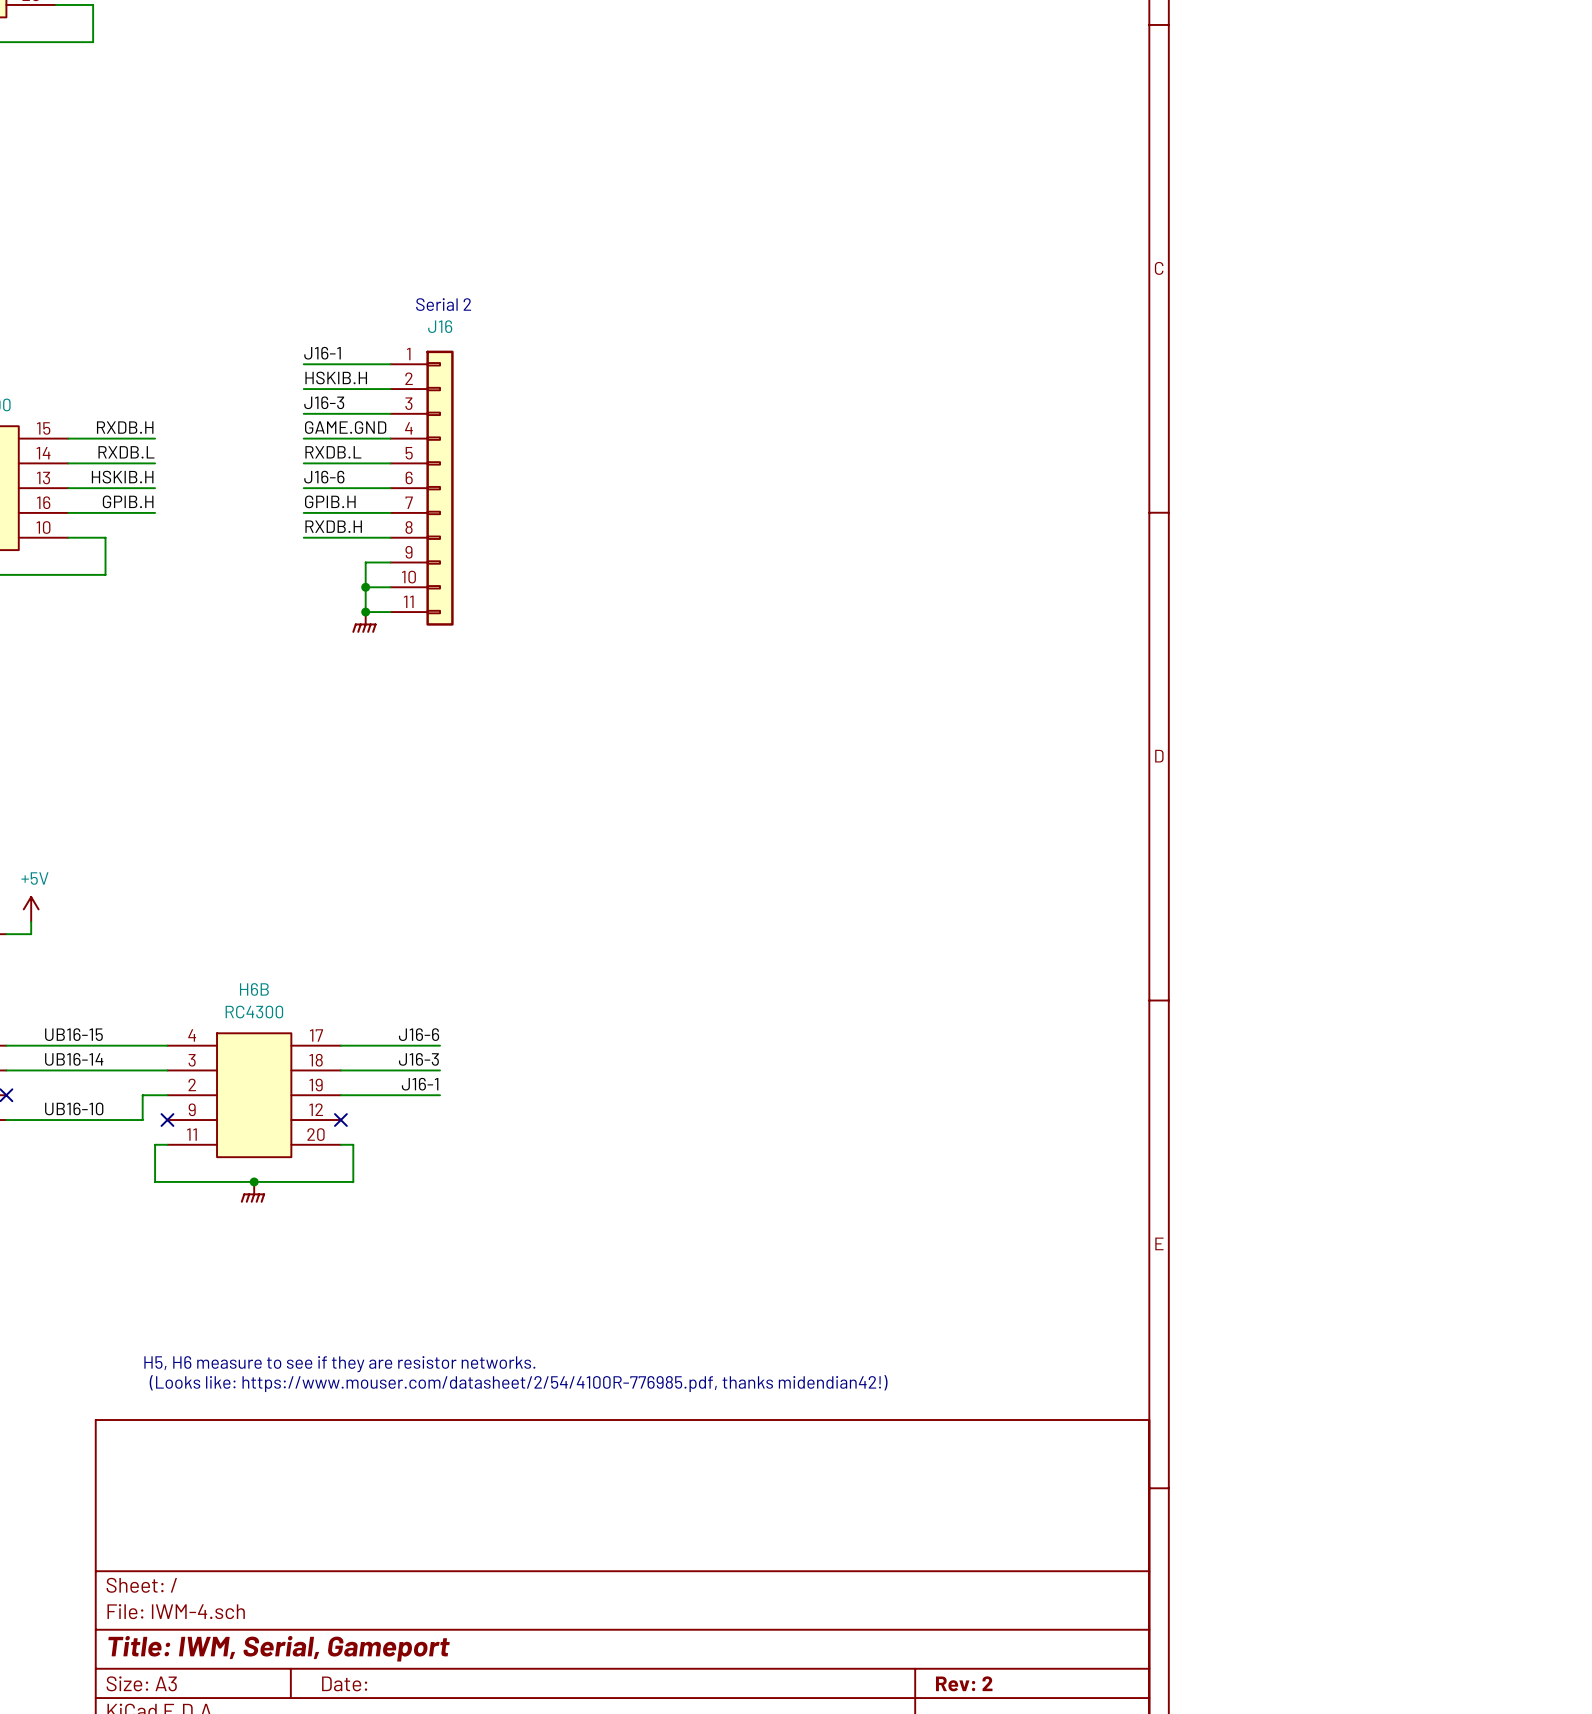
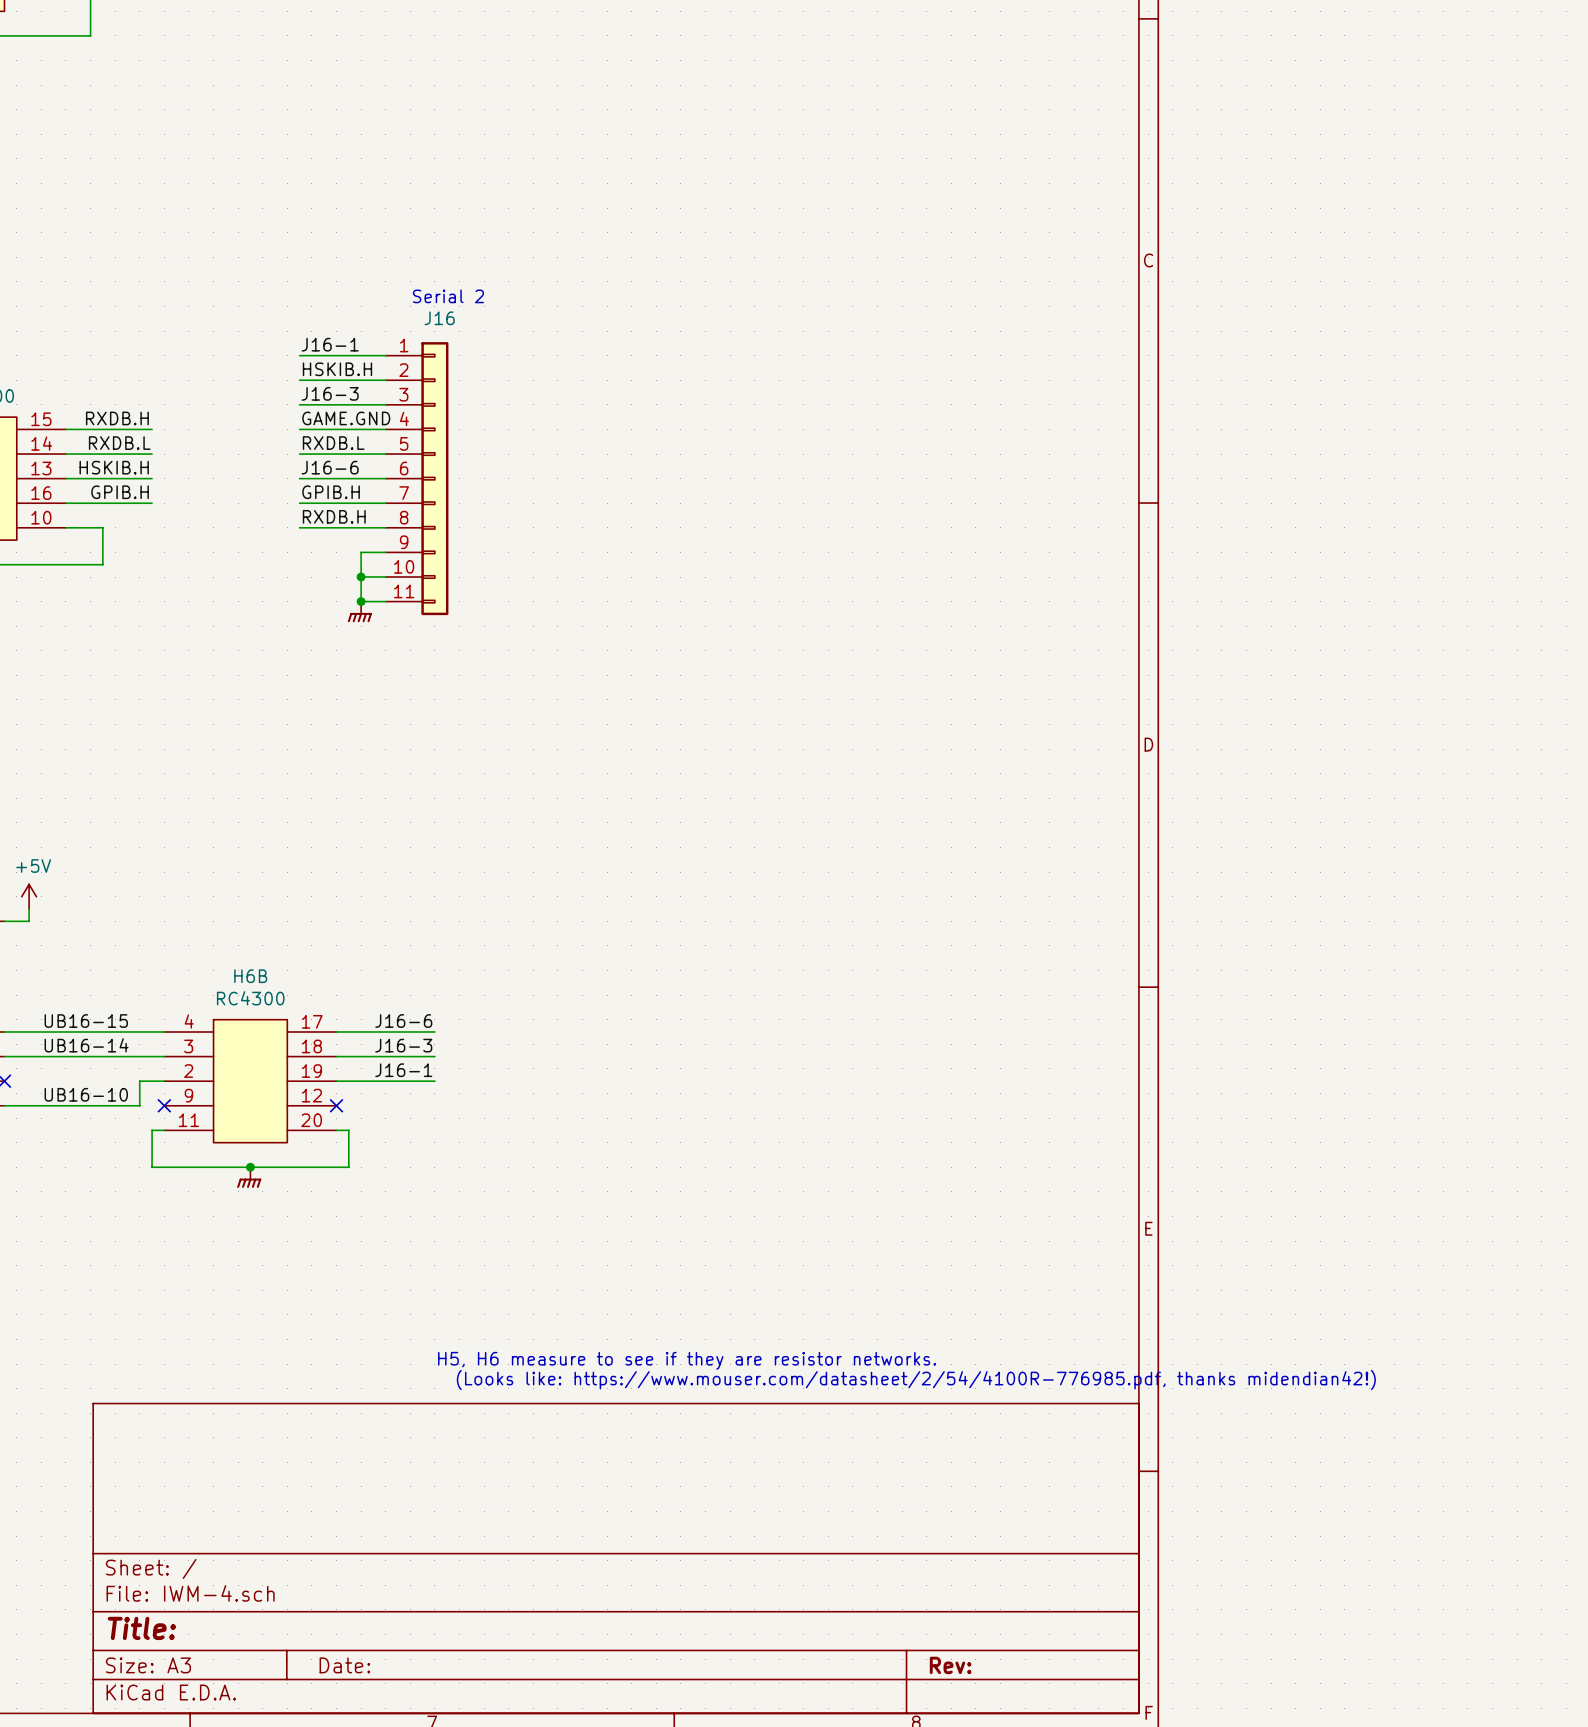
text: H5, H6 measure to see if they are resistor networks. (339, 1364) -> none
text: none -> H5, H6 measure to see if they are resistor networks. (687, 1360)
text: (Looks like: https://www.mouser.com/datasheet/2/54/4100R-776985.pdf, thanks midendian42!) (518, 1383) -> none
text: none -> (Looks like: https://www.mouser.com/datasheet/2/54/4100R-776985.pdf, thanks midendian42!) (916, 1380)
title block: Title: IWM, Serial, Gameport (279, 1648) -> Title: (141, 1628)
title block: Rev: 2 (964, 1683) -> Rev: (950, 1665)

